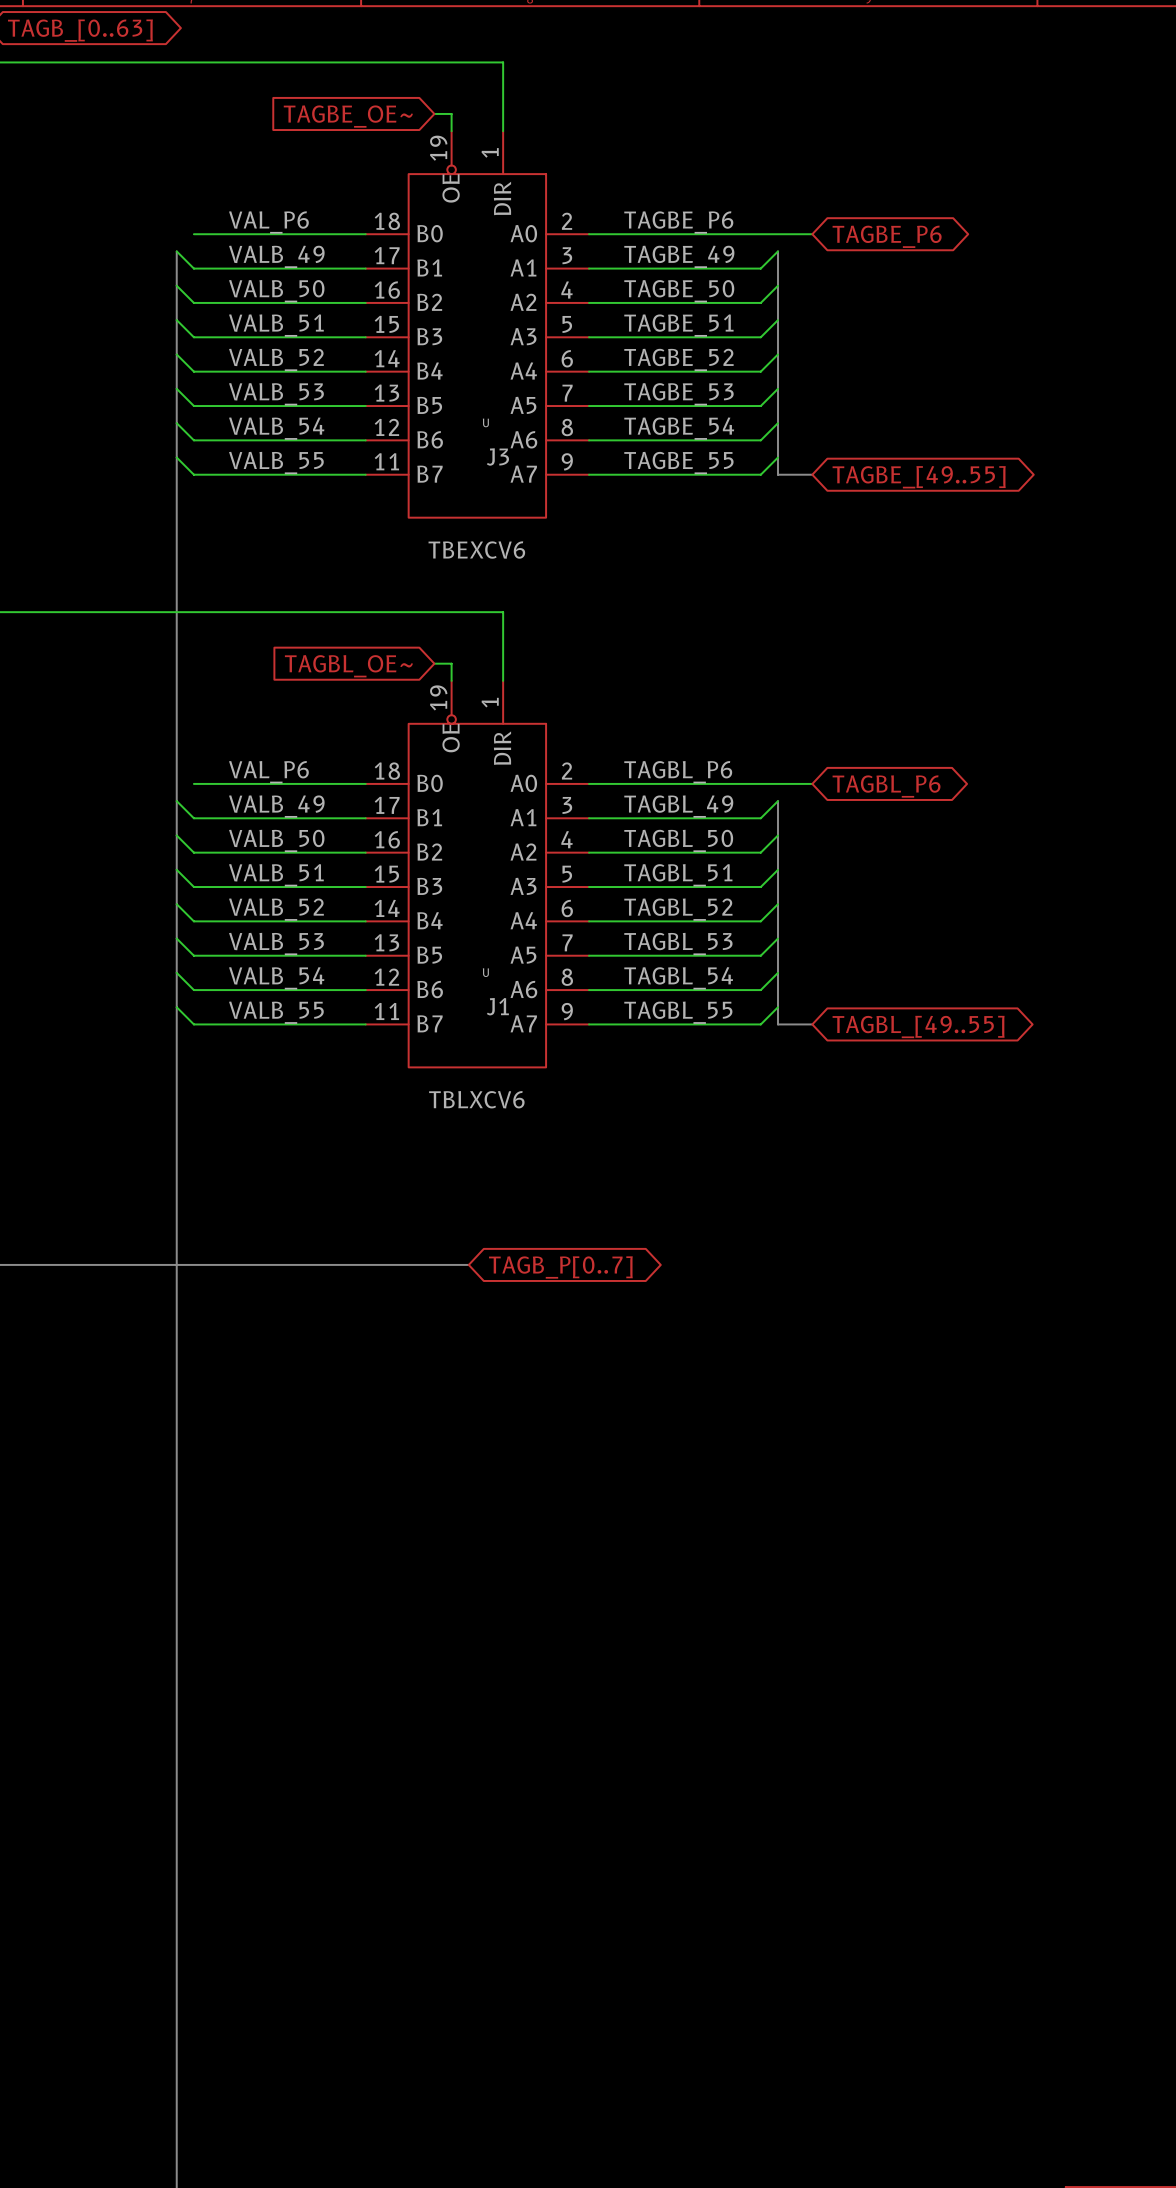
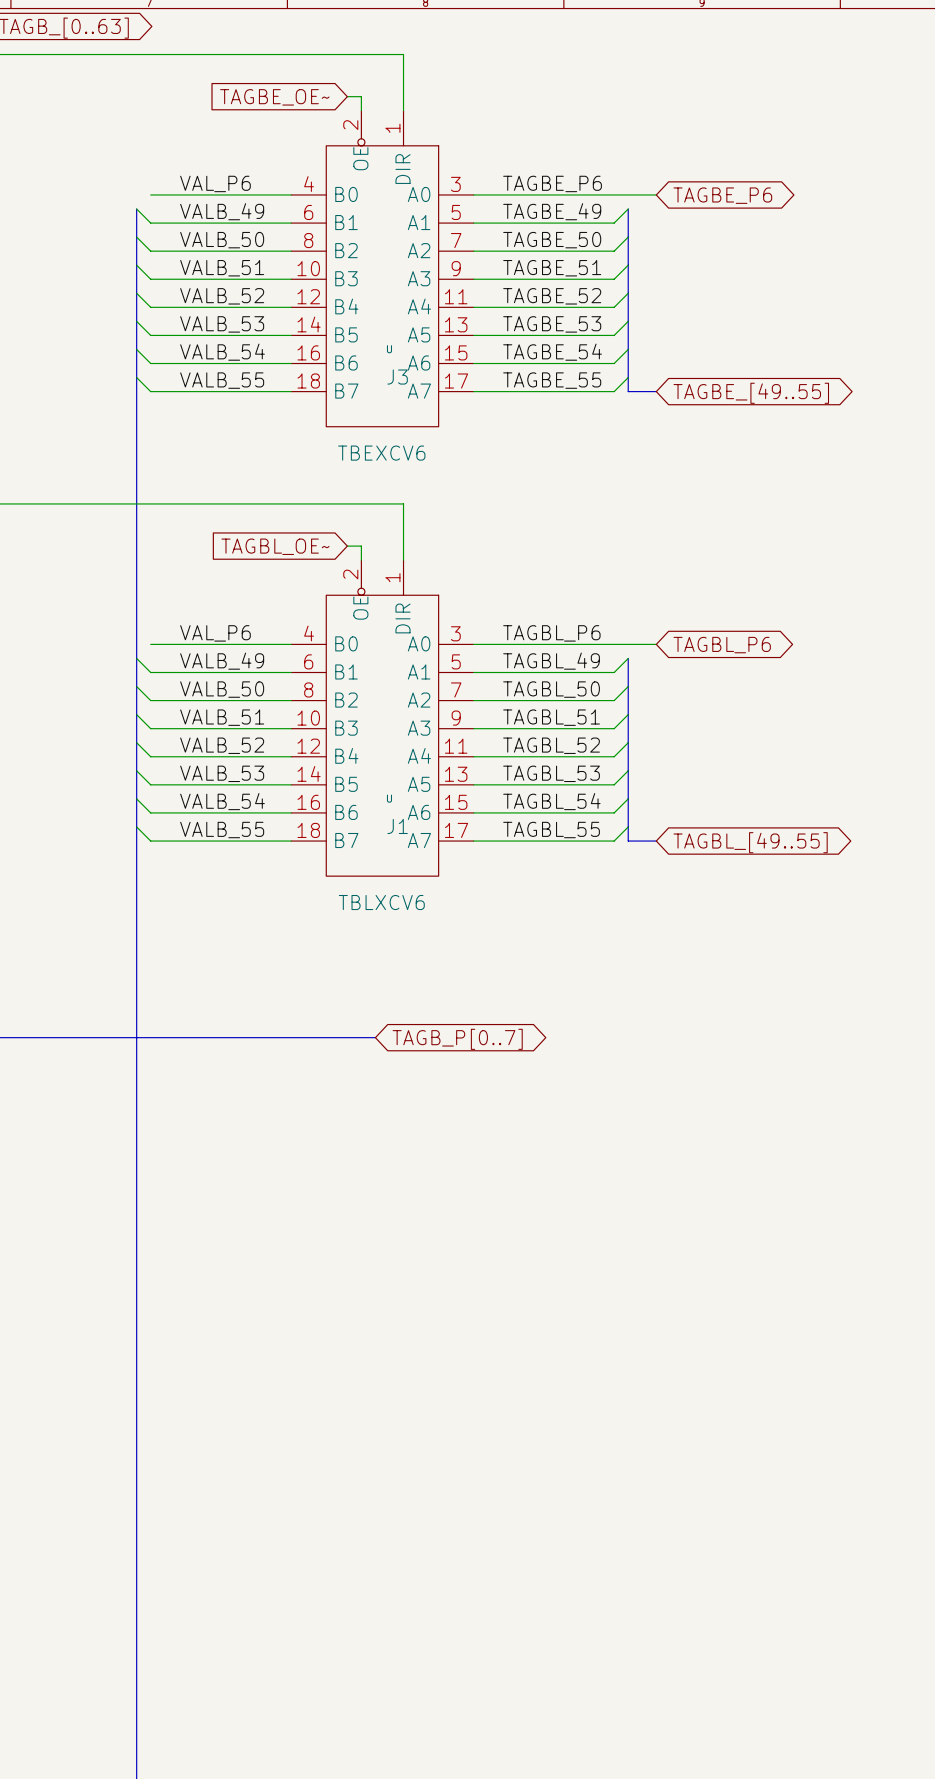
U symbol: [365, 131, 590, 518] -> [291, 110, 474, 427]
U symbol: [365, 680, 590, 1068] -> [291, 560, 474, 877]

